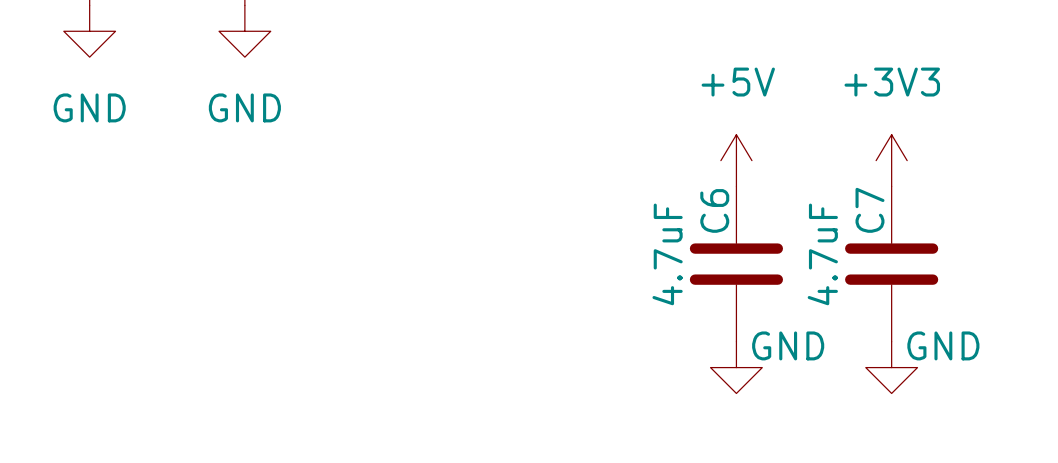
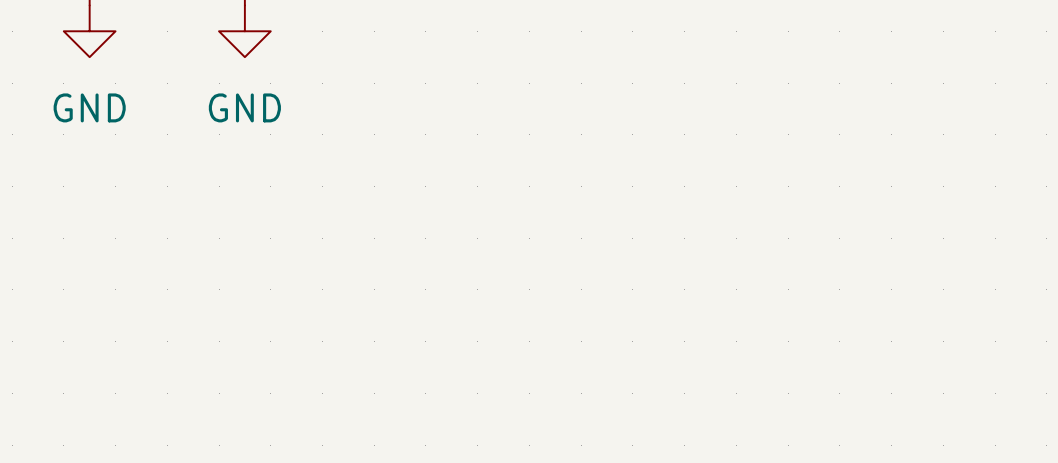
power symbol: +5V (736, 160) -> none
power symbol: +3V3 (891, 160) -> none
C6: 4.7uF (736, 264) -> none
C7: 4.7uF (891, 264) -> none
power symbol: GND (736, 367) -> none
power symbol: GND (891, 367) -> none

